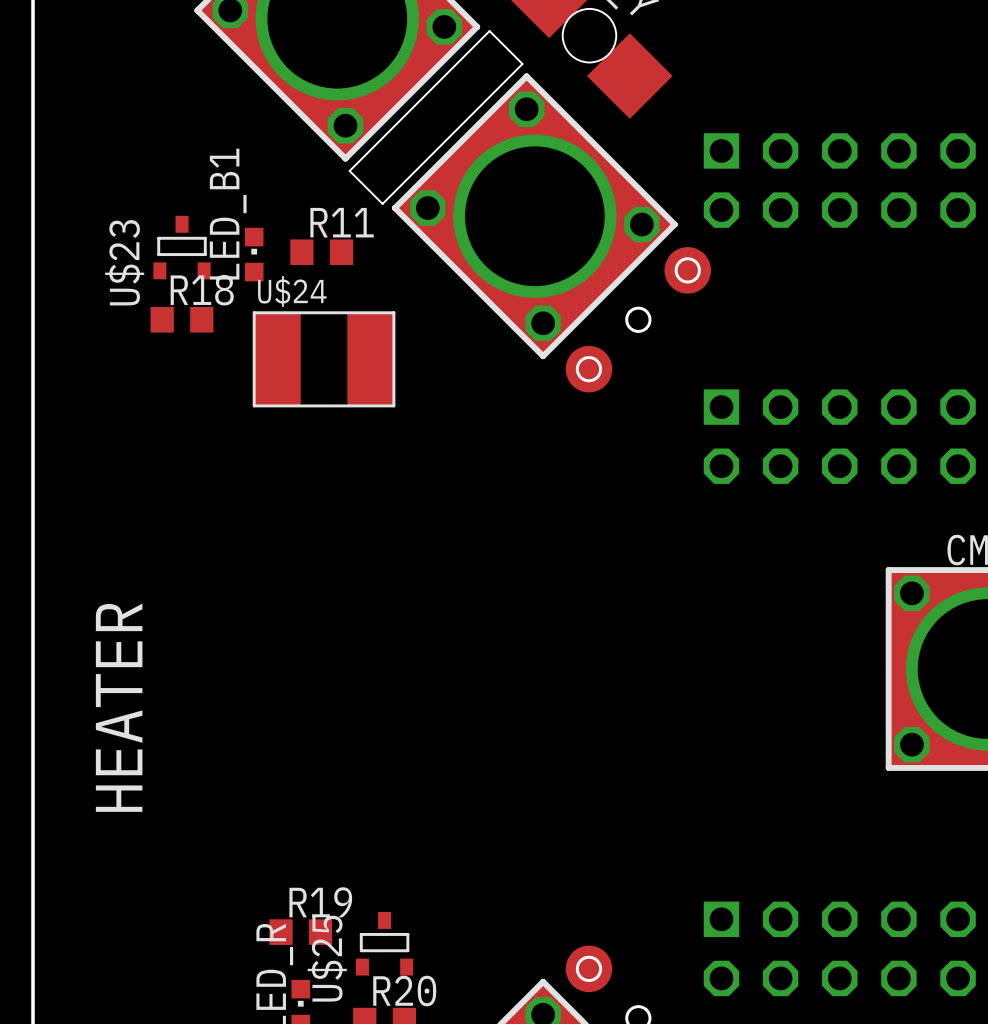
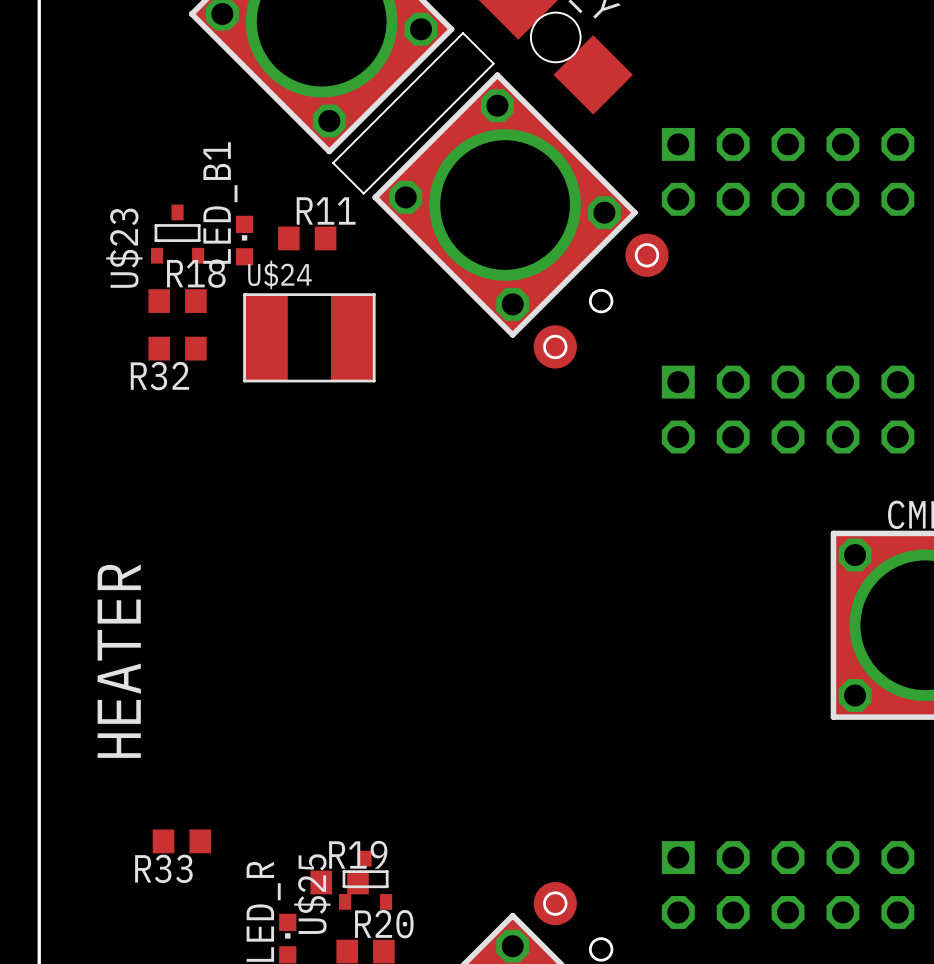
R32: none -> (177, 348)
R33: none -> (181, 841)
R19 position: (300, 932) -> (339, 882)

